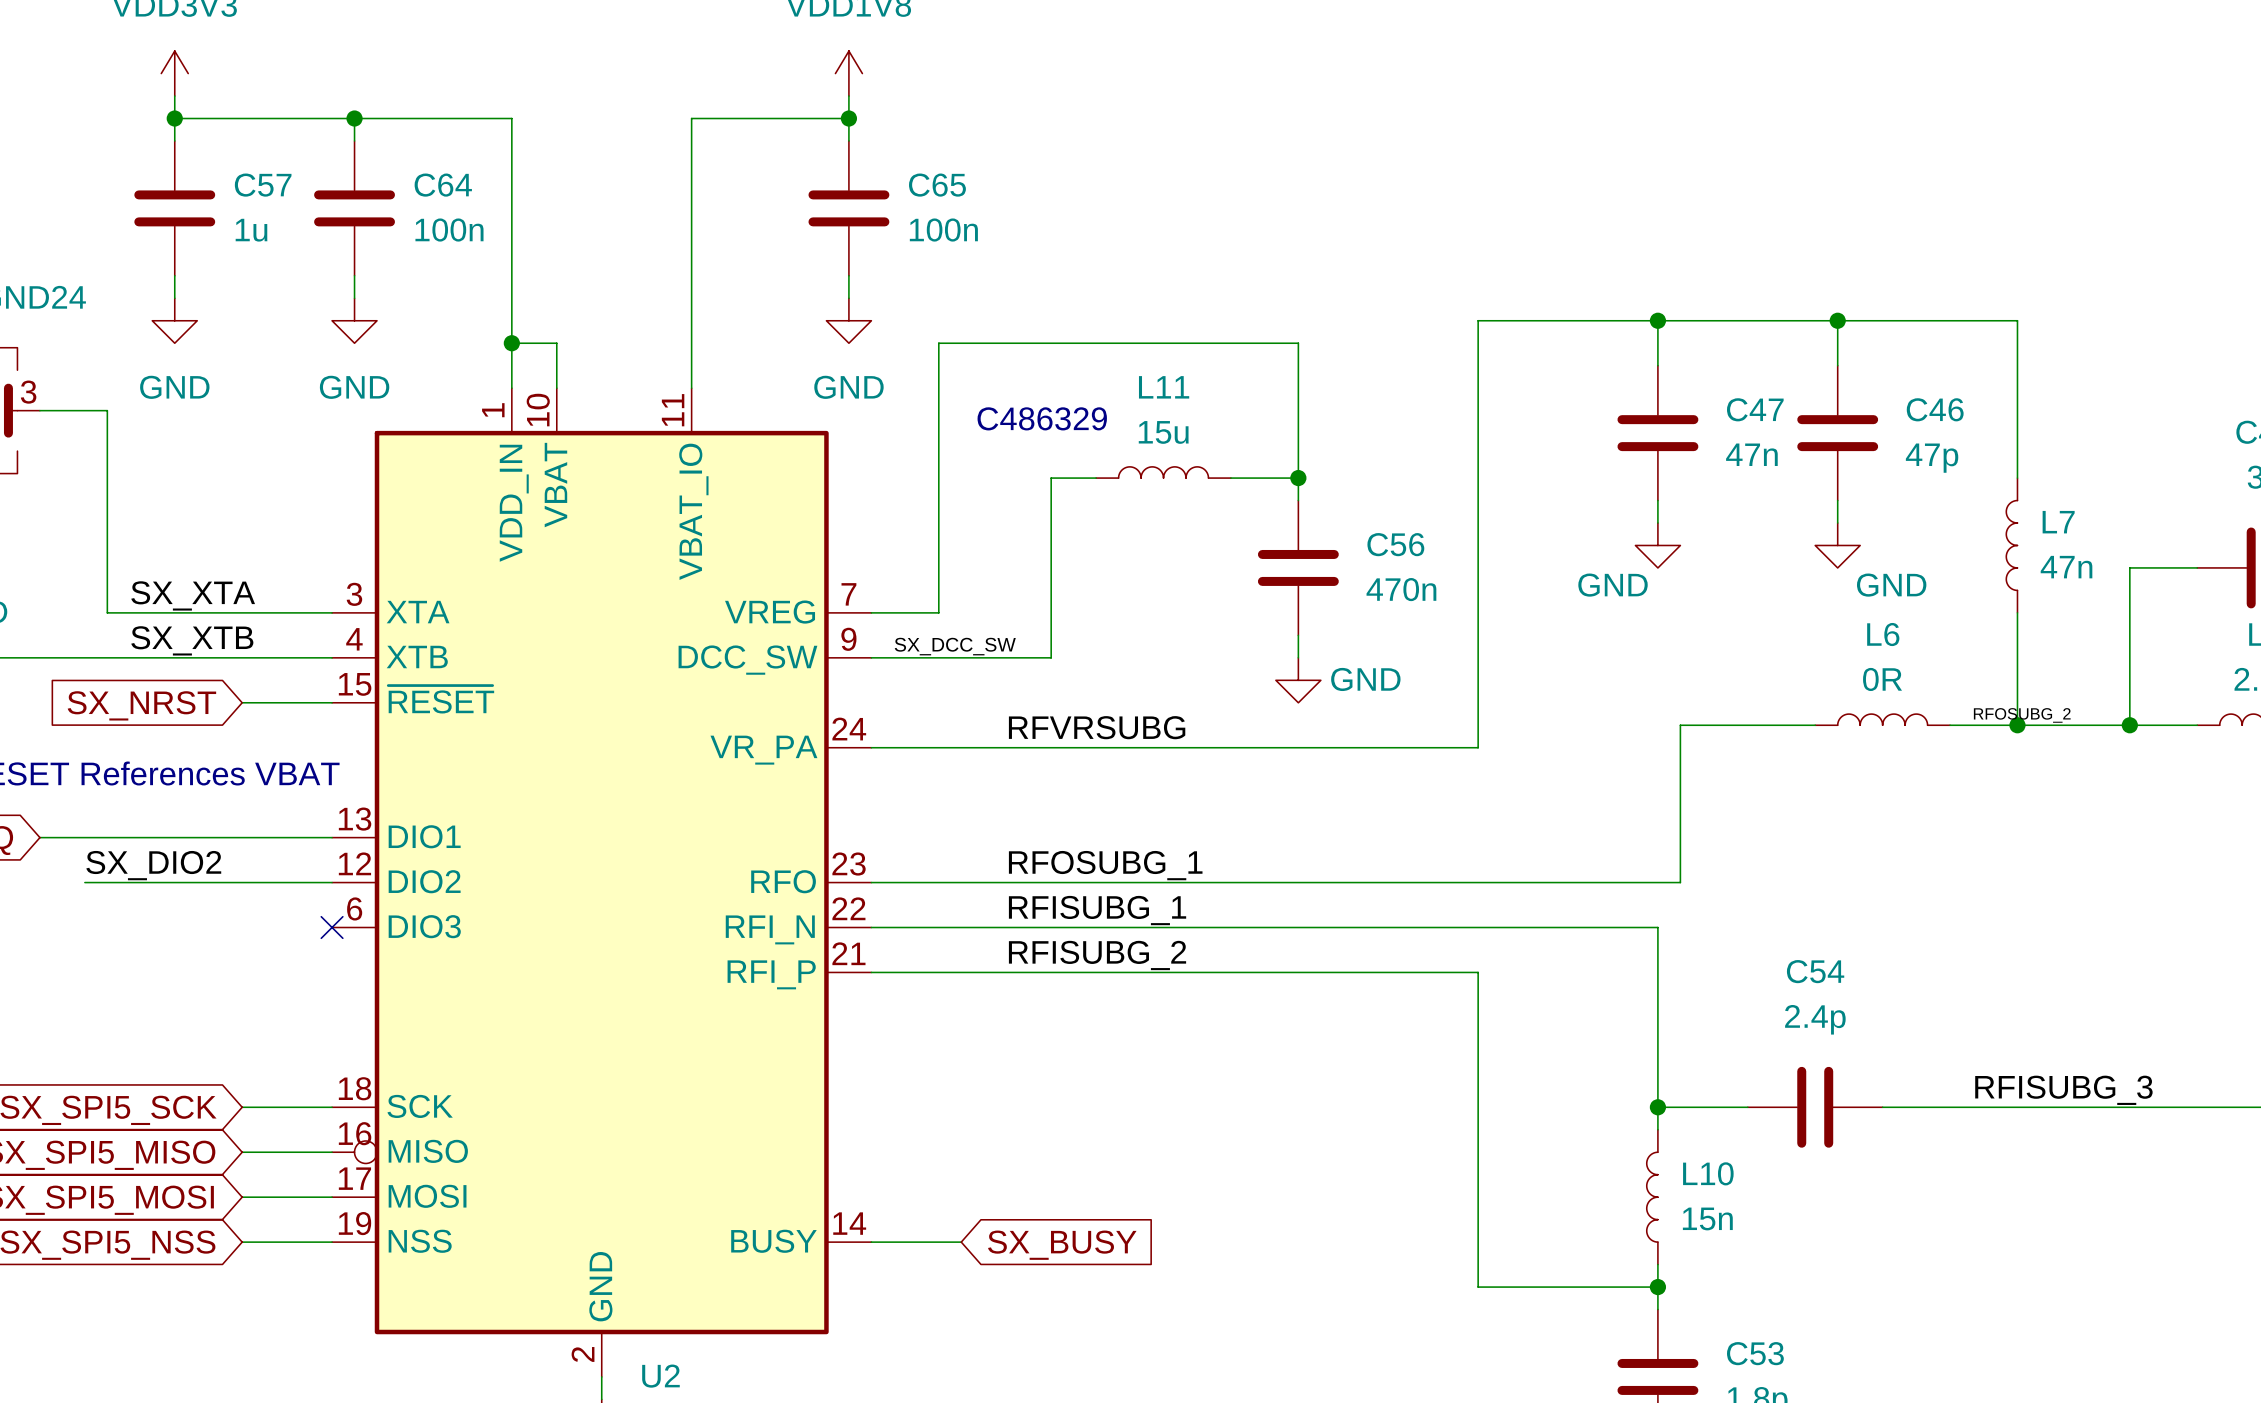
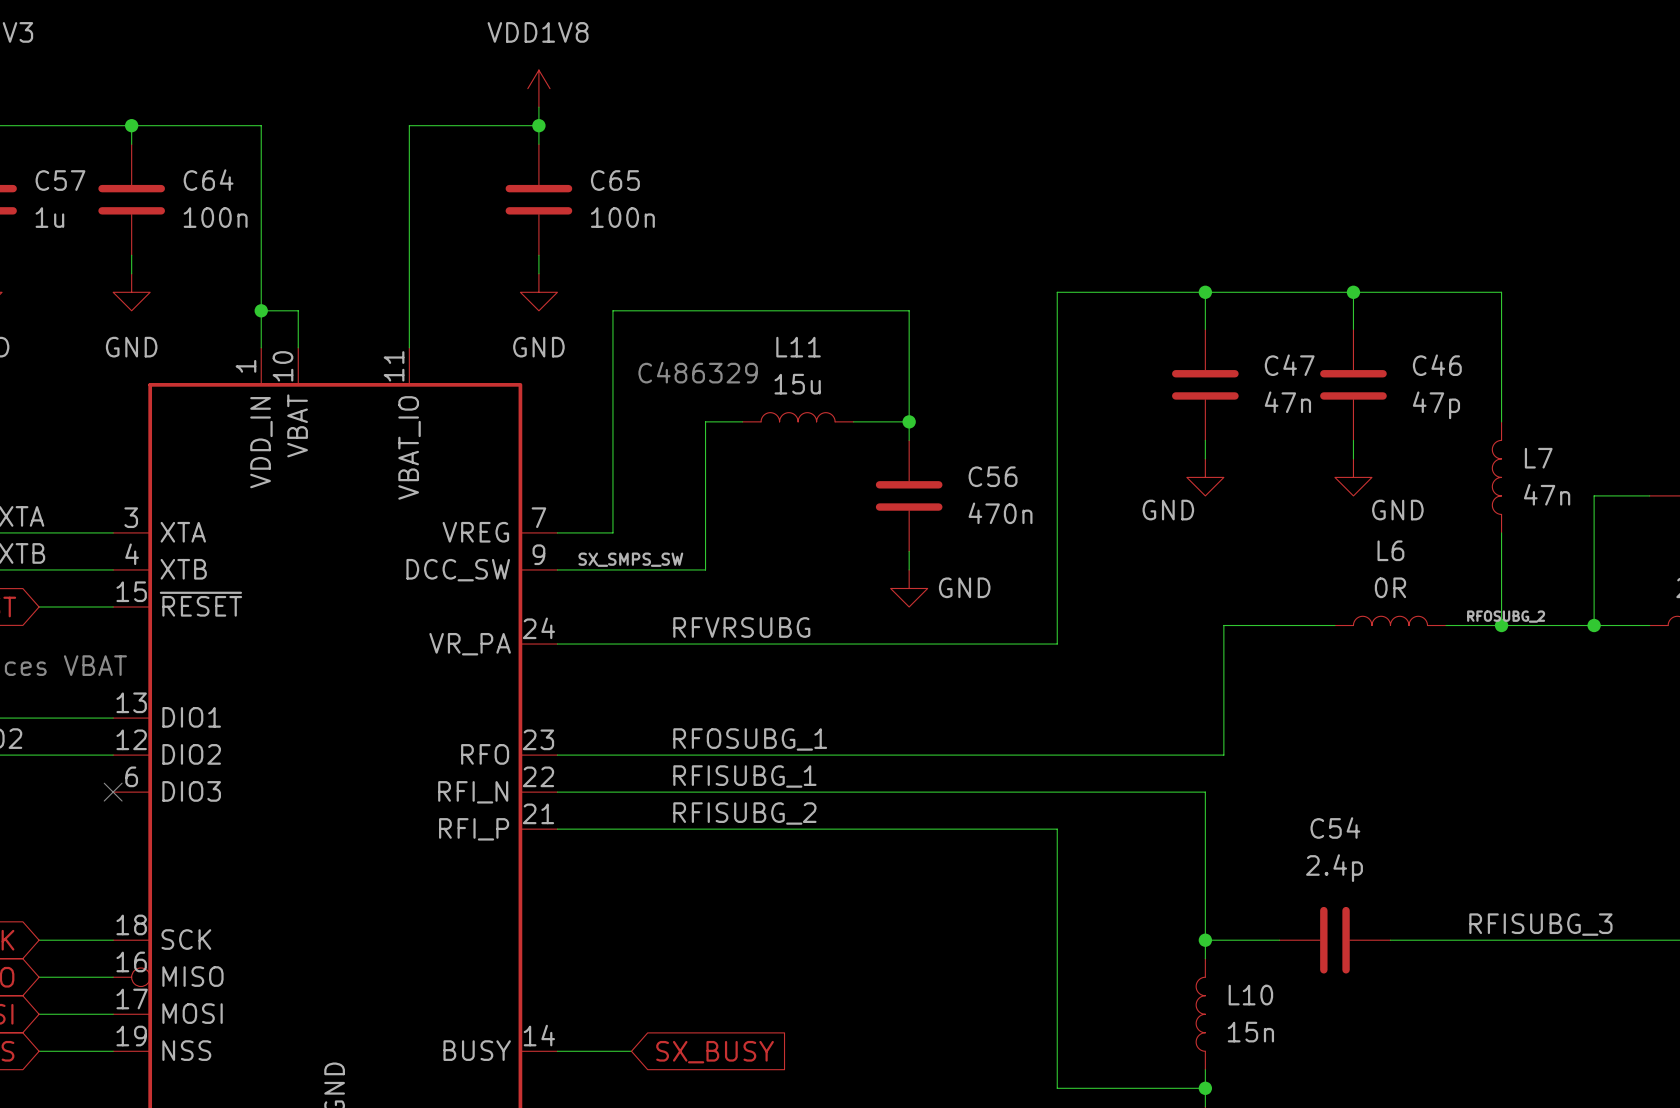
label: SX_DCC_SW (955, 646) -> SX_SMPS_SW (630, 559)

